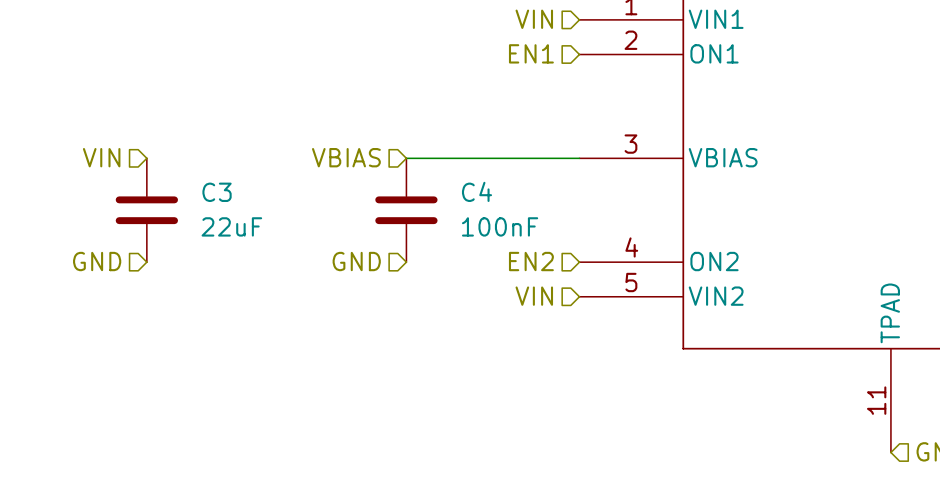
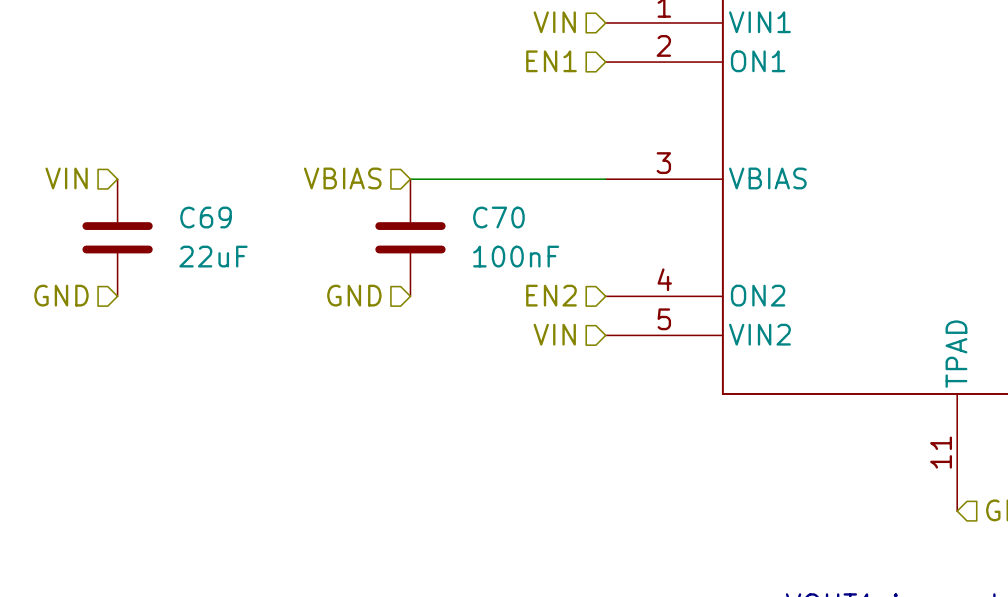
C4 name: C4 (477, 191) -> C70 (498, 217)
C3 name: C3 (217, 192) -> C69 (206, 217)

